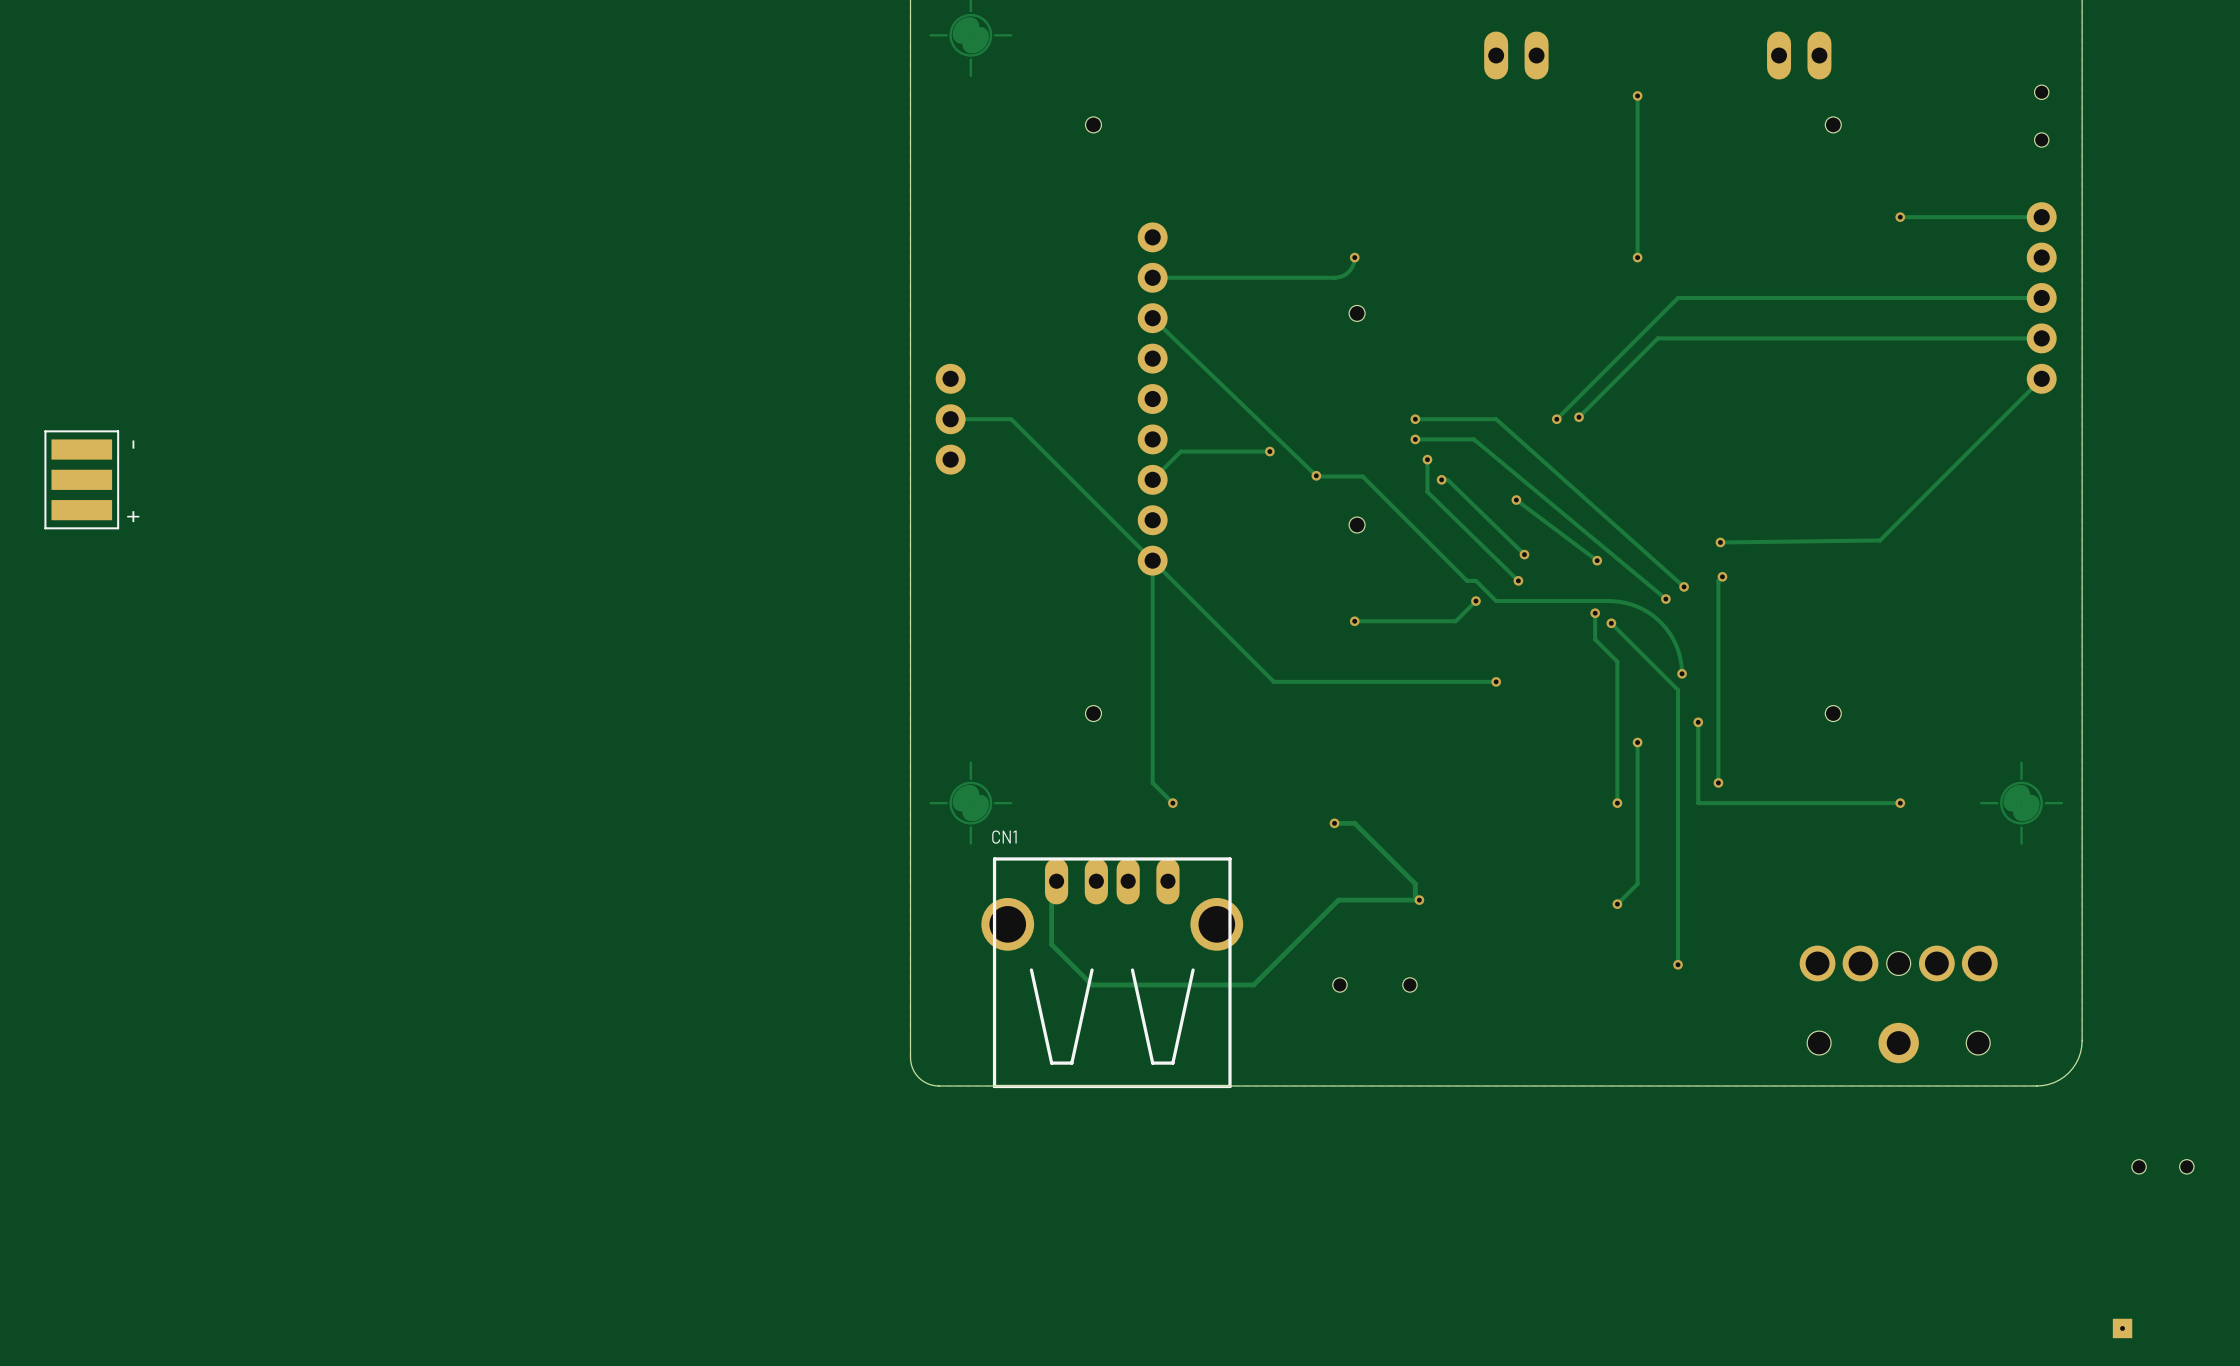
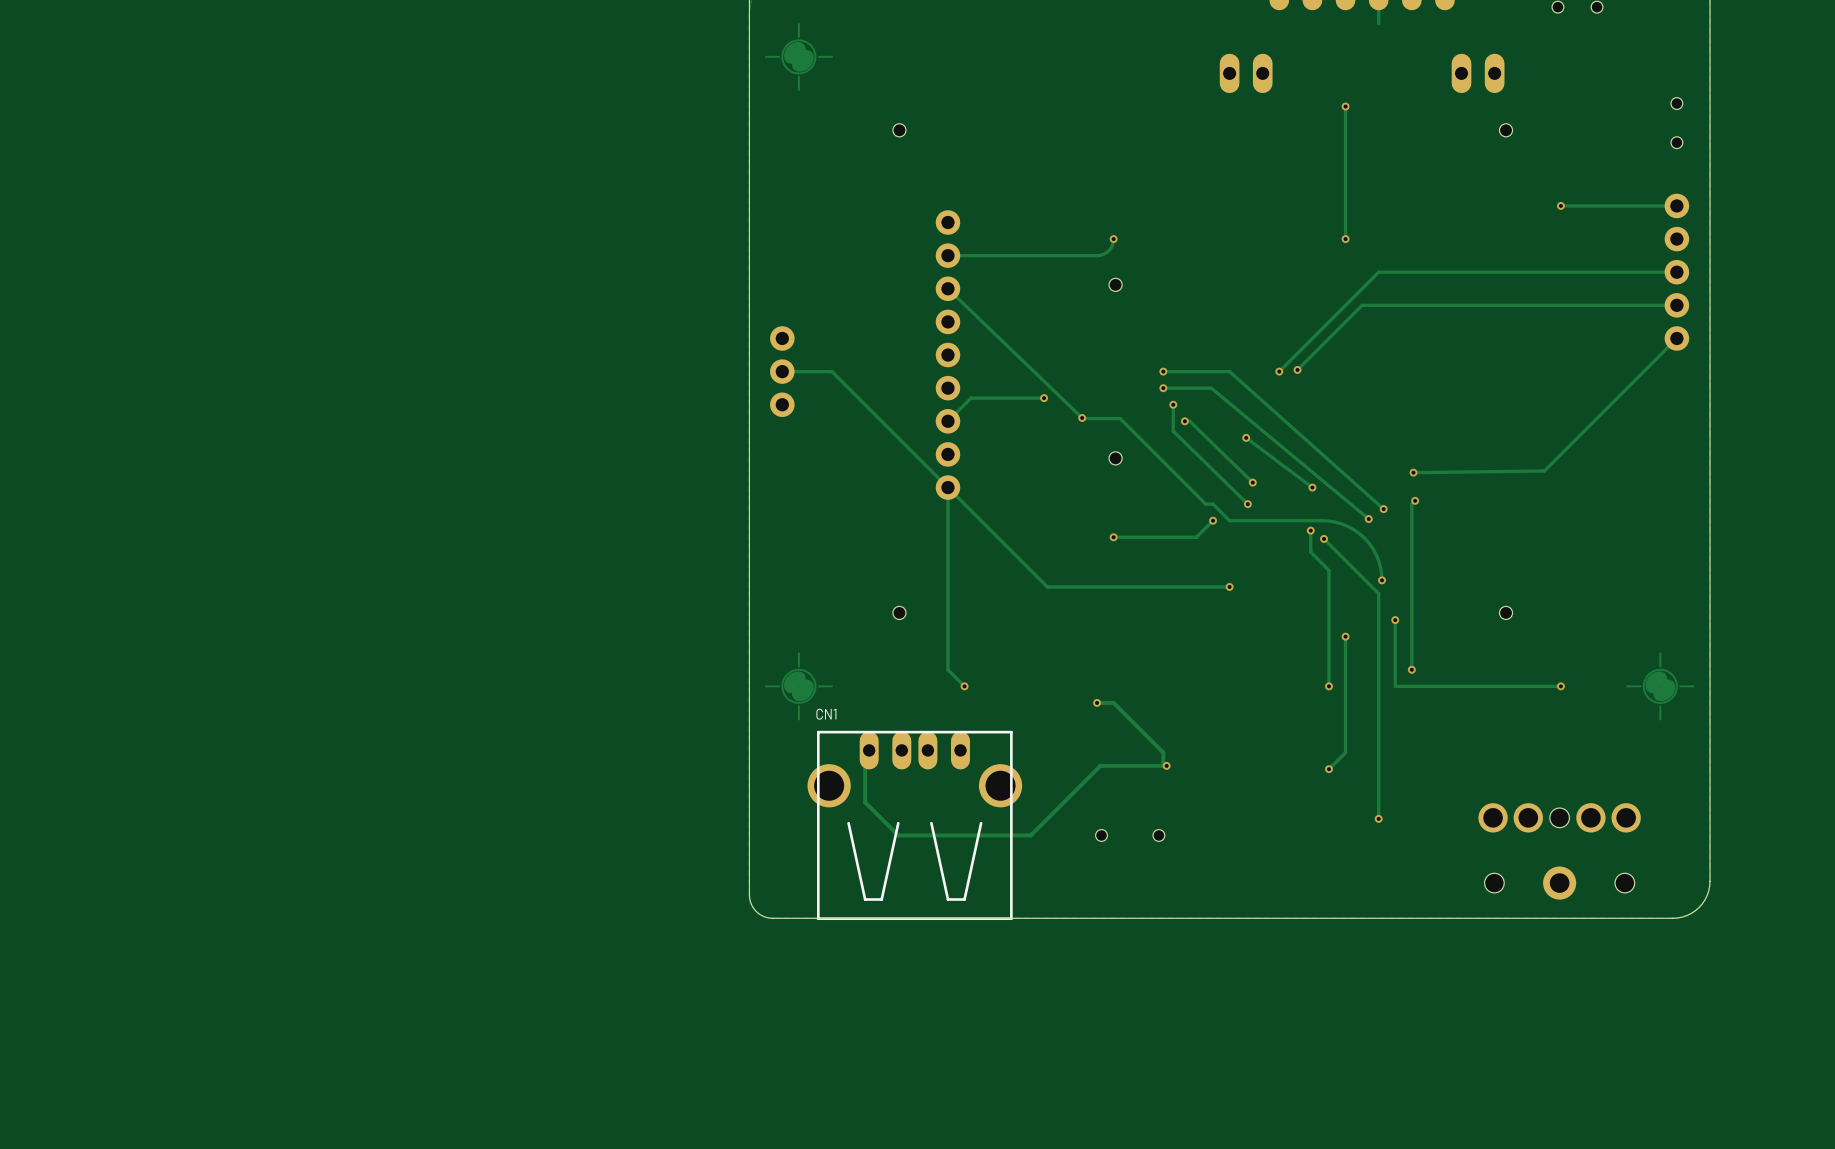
part: (81, 479) -> none
part: (2162, 1166) -> none
part: (2122, 1328) -> none

